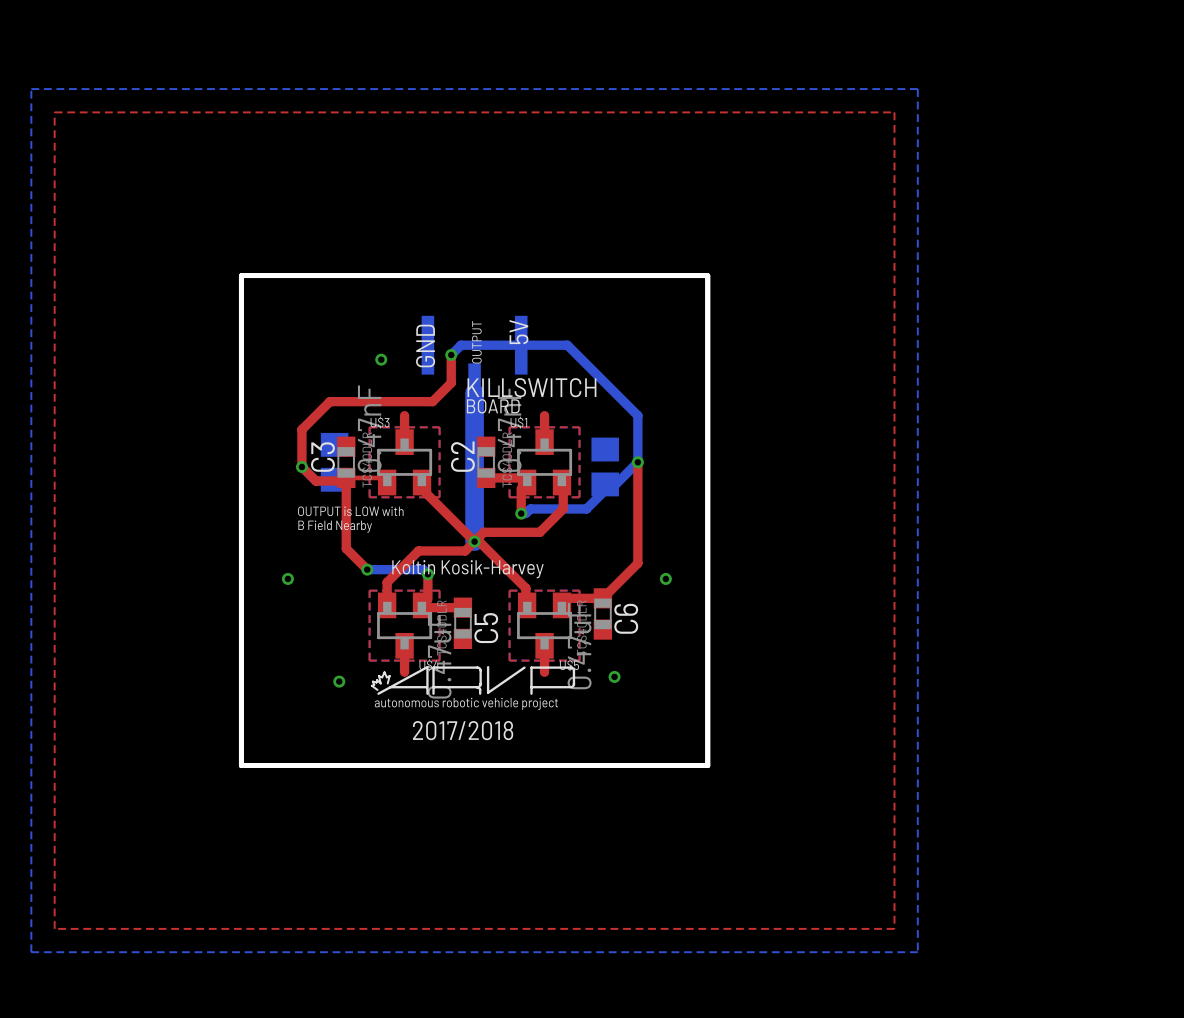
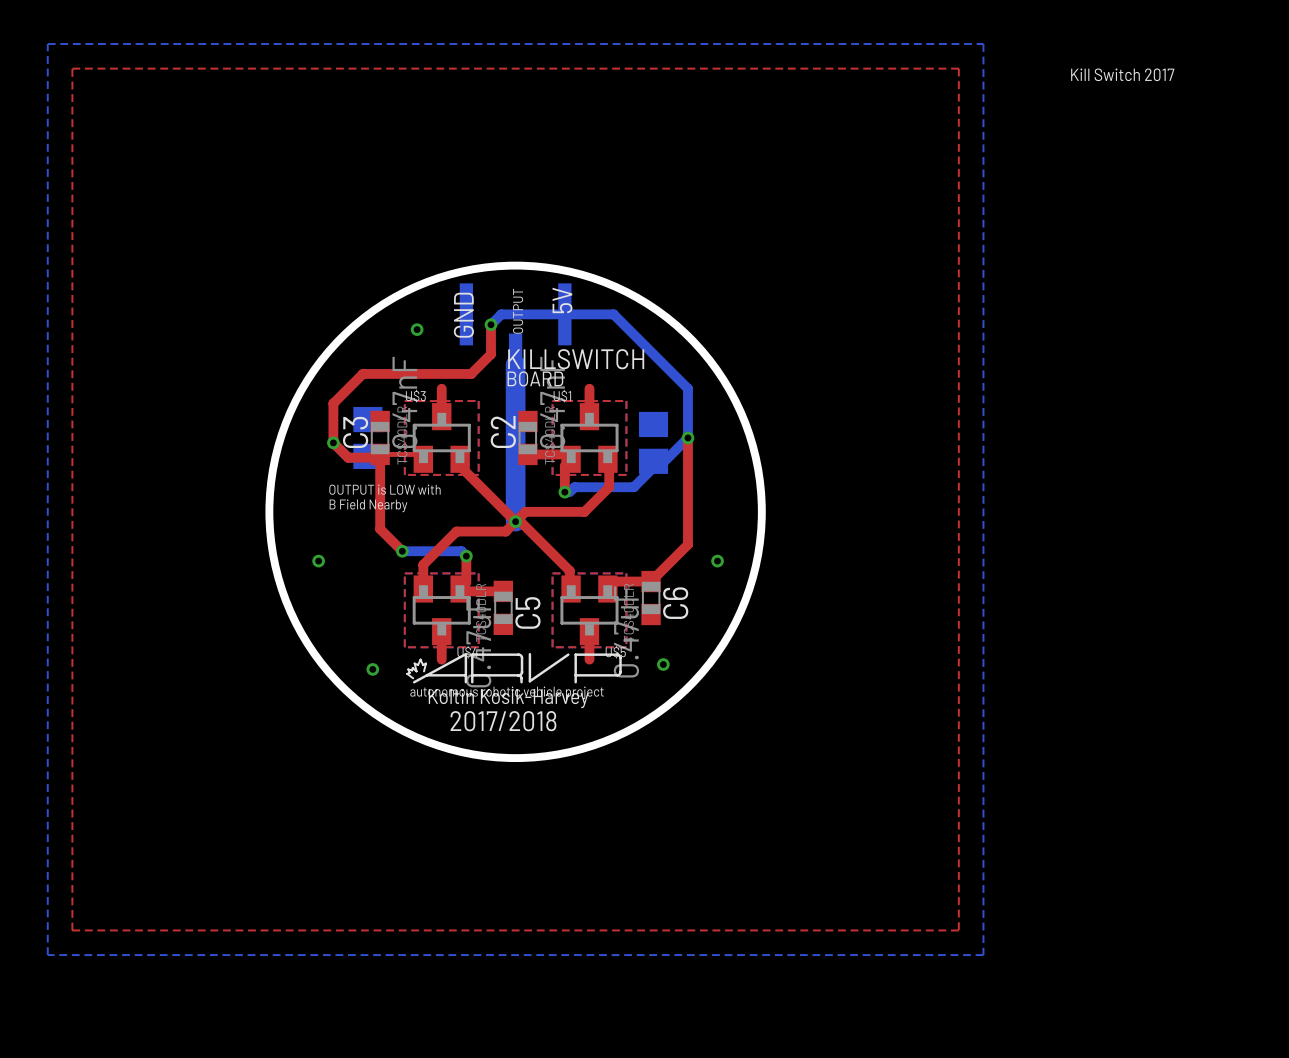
text: none -> Kill Switch 2017 (1122, 74)
board edge: (241, 275) (241, 765) (707, 765) (707, 275) (241, 275) -> none
round board edge: none -> [265, 261, 766, 763]
text position: Koltin Kosik-Harvey (467, 569) -> Koltin Kosik-Harvey (508, 698)

